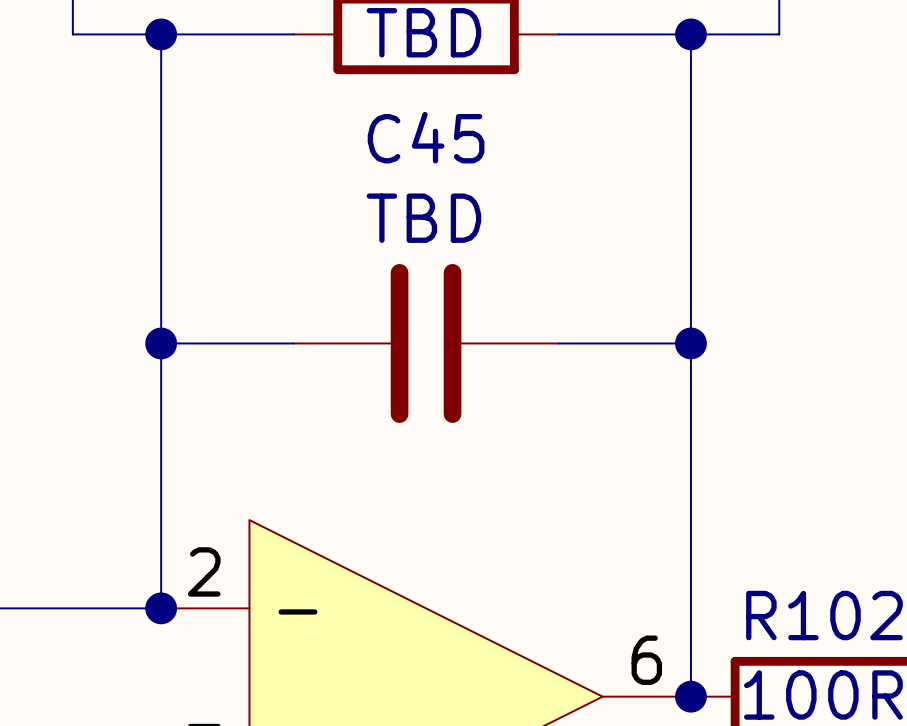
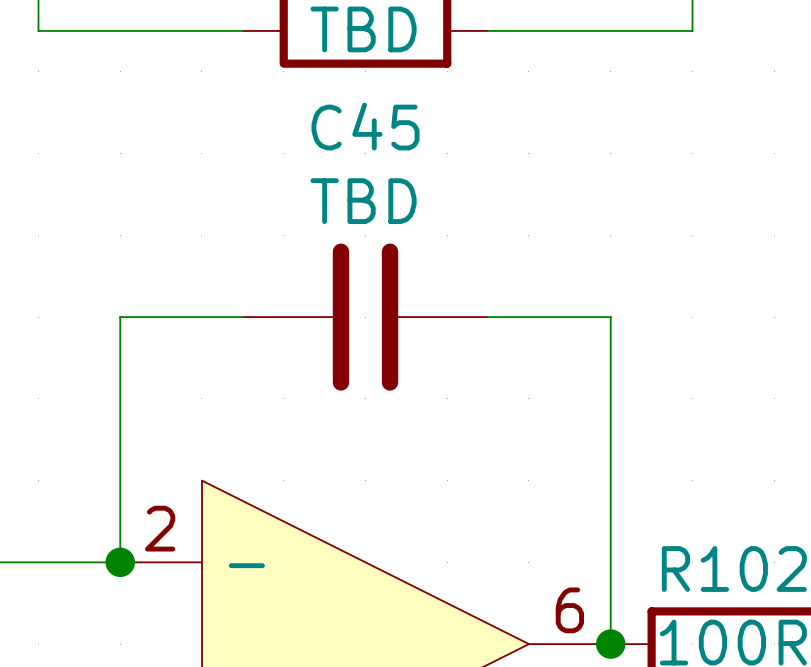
wire: (161, 34) (161, 343) -> none
junction: (161, 34) -> none
wire: (690, 34) (690, 343) -> none
junction: (690, 34) -> none
junction: (161, 343) -> none
junction: (690, 343) -> none

